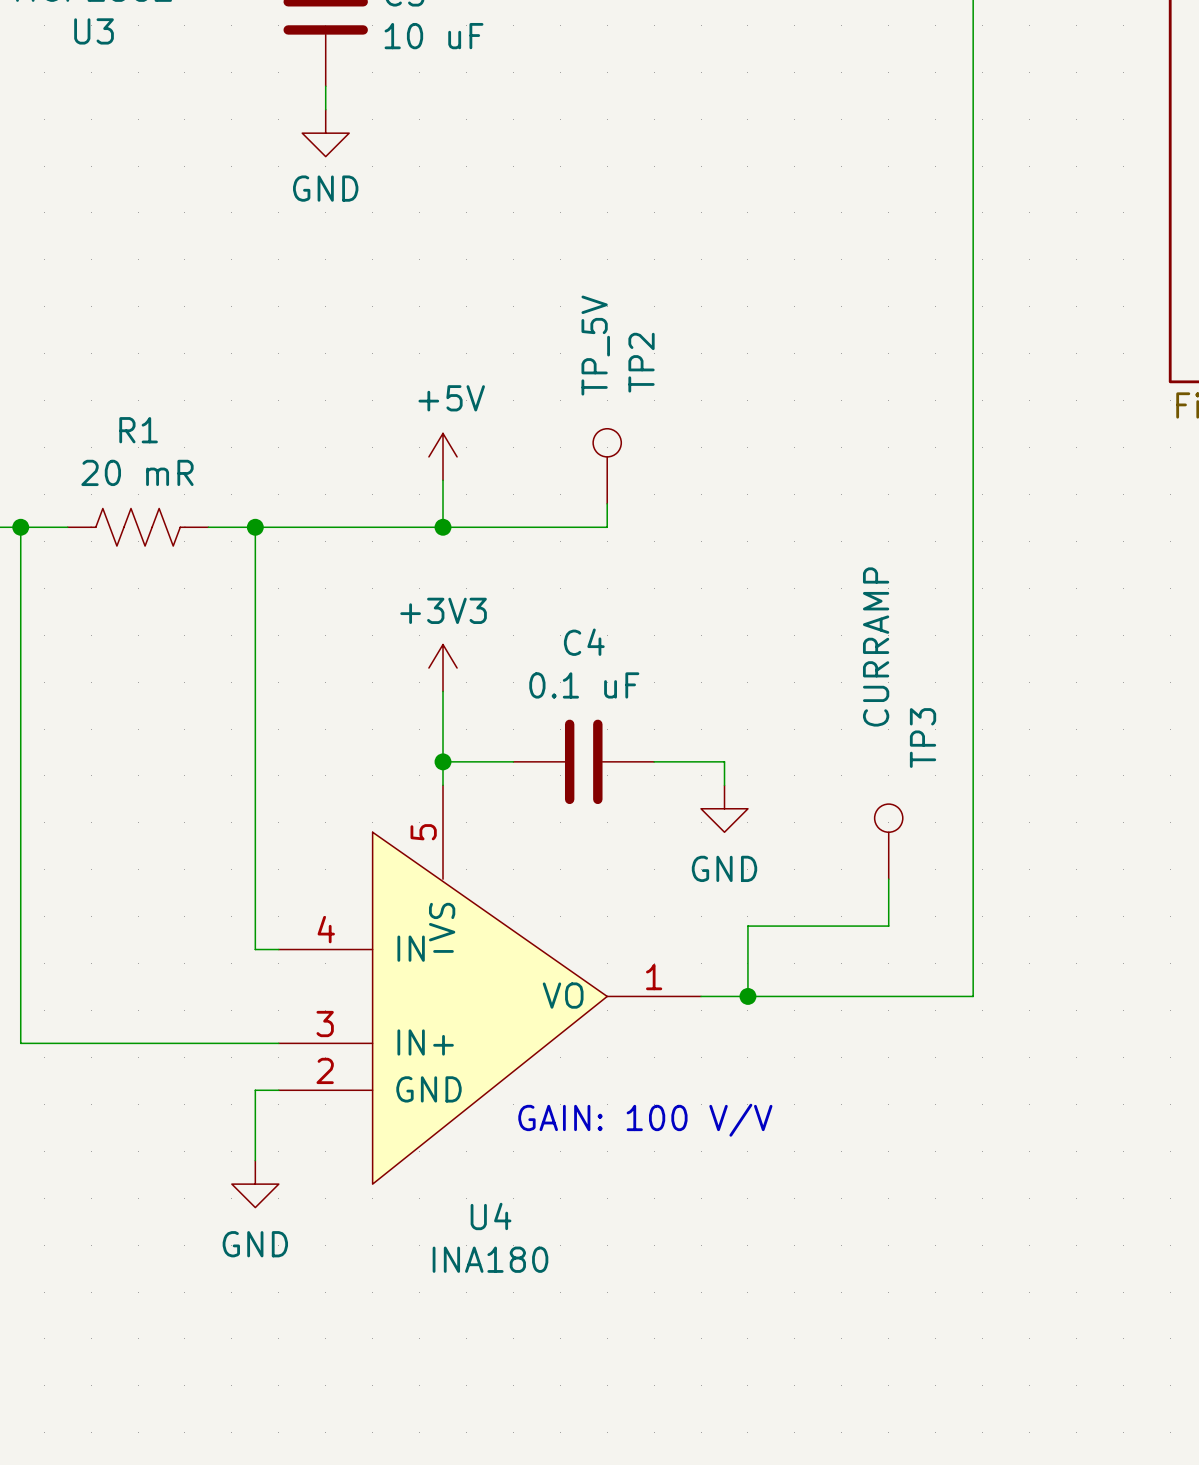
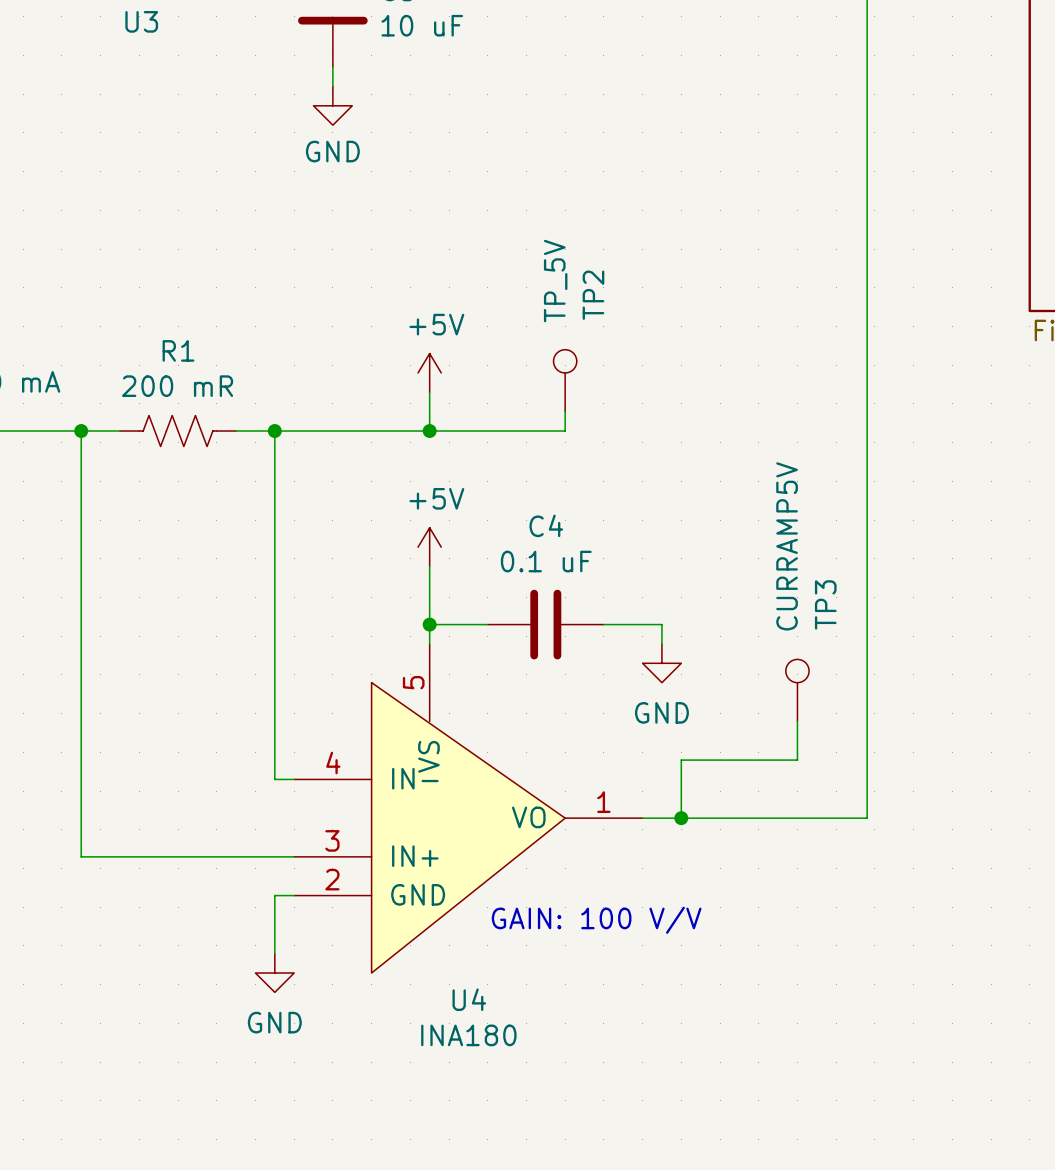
R1 value: 20 mR (137, 472) -> 200 mR (177, 386)
TP3 value: CURRAMP (876, 646) -> CURRAMP5V (787, 546)
power symbol: +3V3 (443, 668) -> +5V (429, 547)

